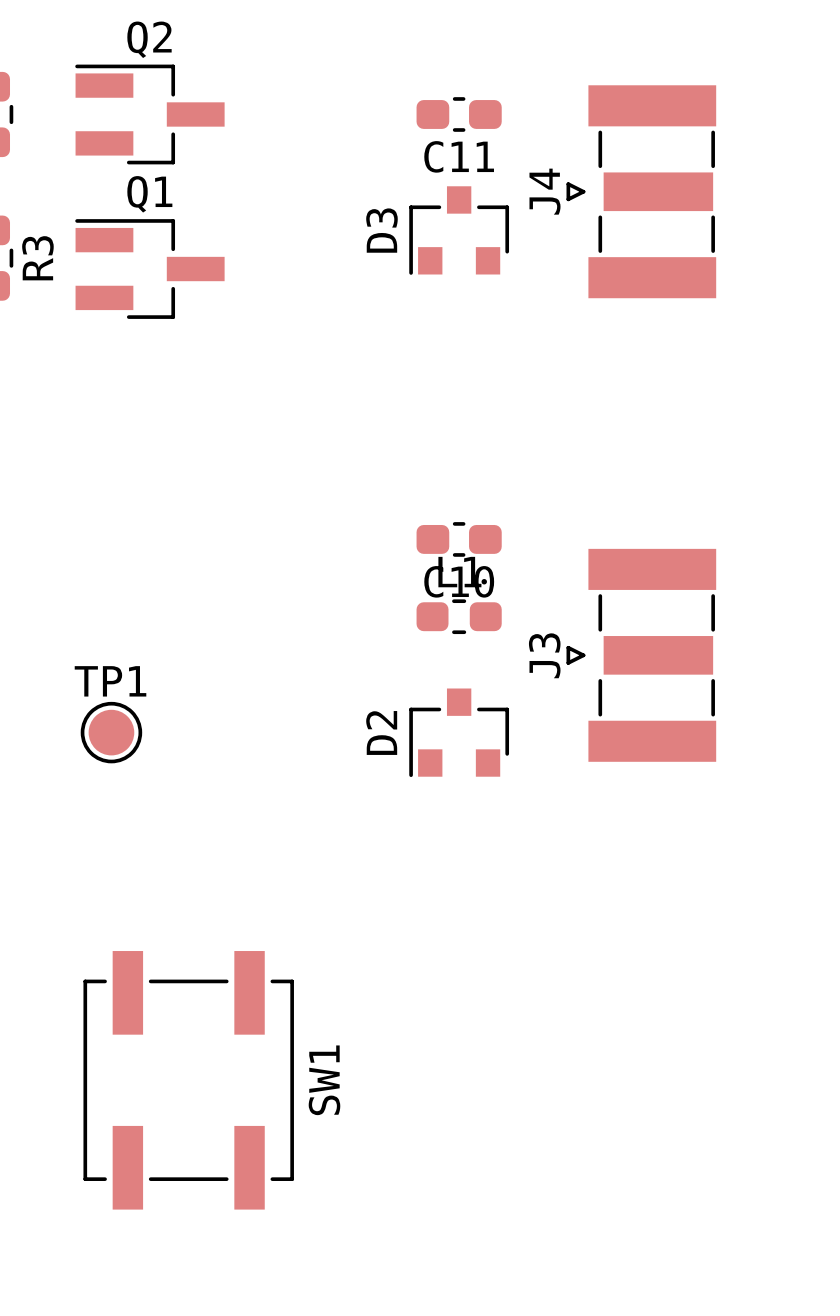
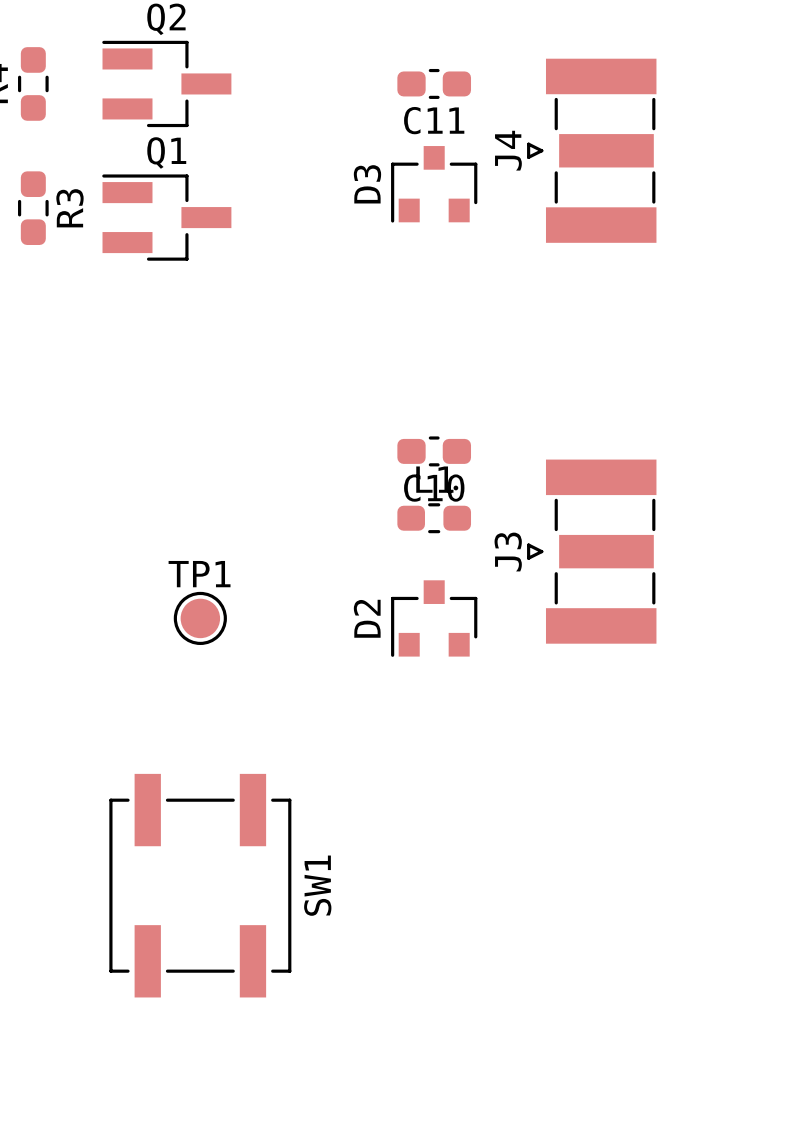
TP1 position: (111, 732) -> (200, 618)
SW1 position: (188, 1080) -> (200, 885)

